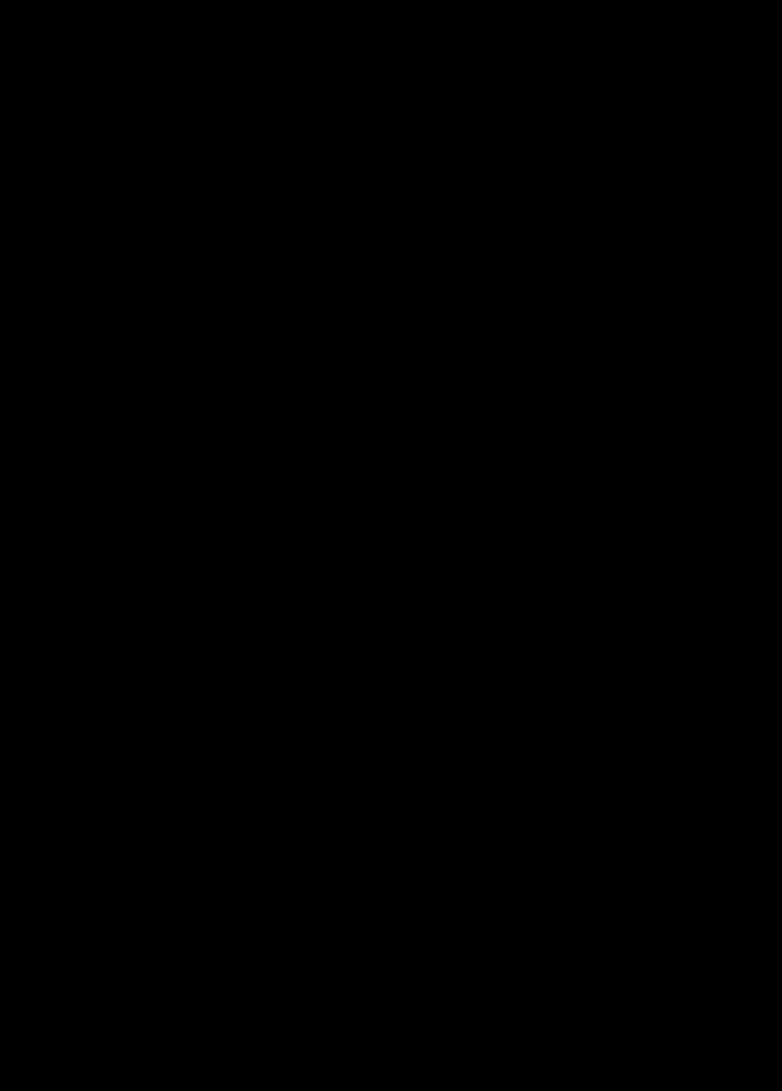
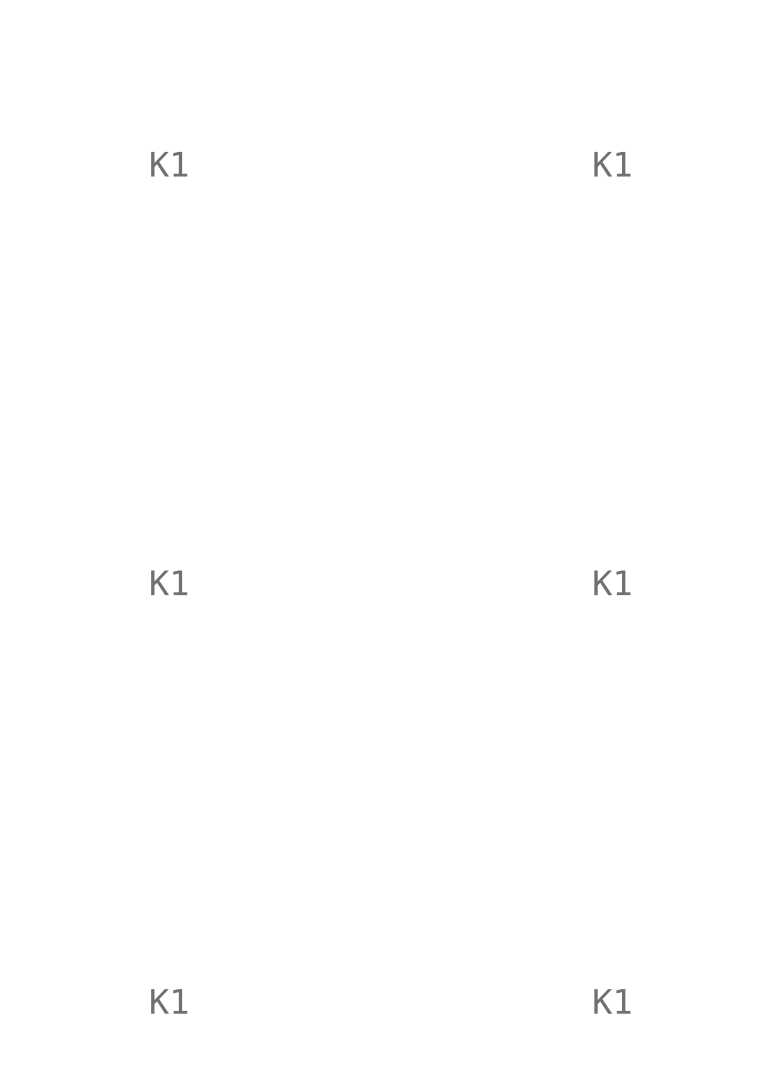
K1: none -> (169, 164)
K1: none -> (612, 164)
K1: none -> (169, 582)
K1: none -> (612, 582)
K1: none -> (169, 1001)
K1: none -> (612, 1001)

